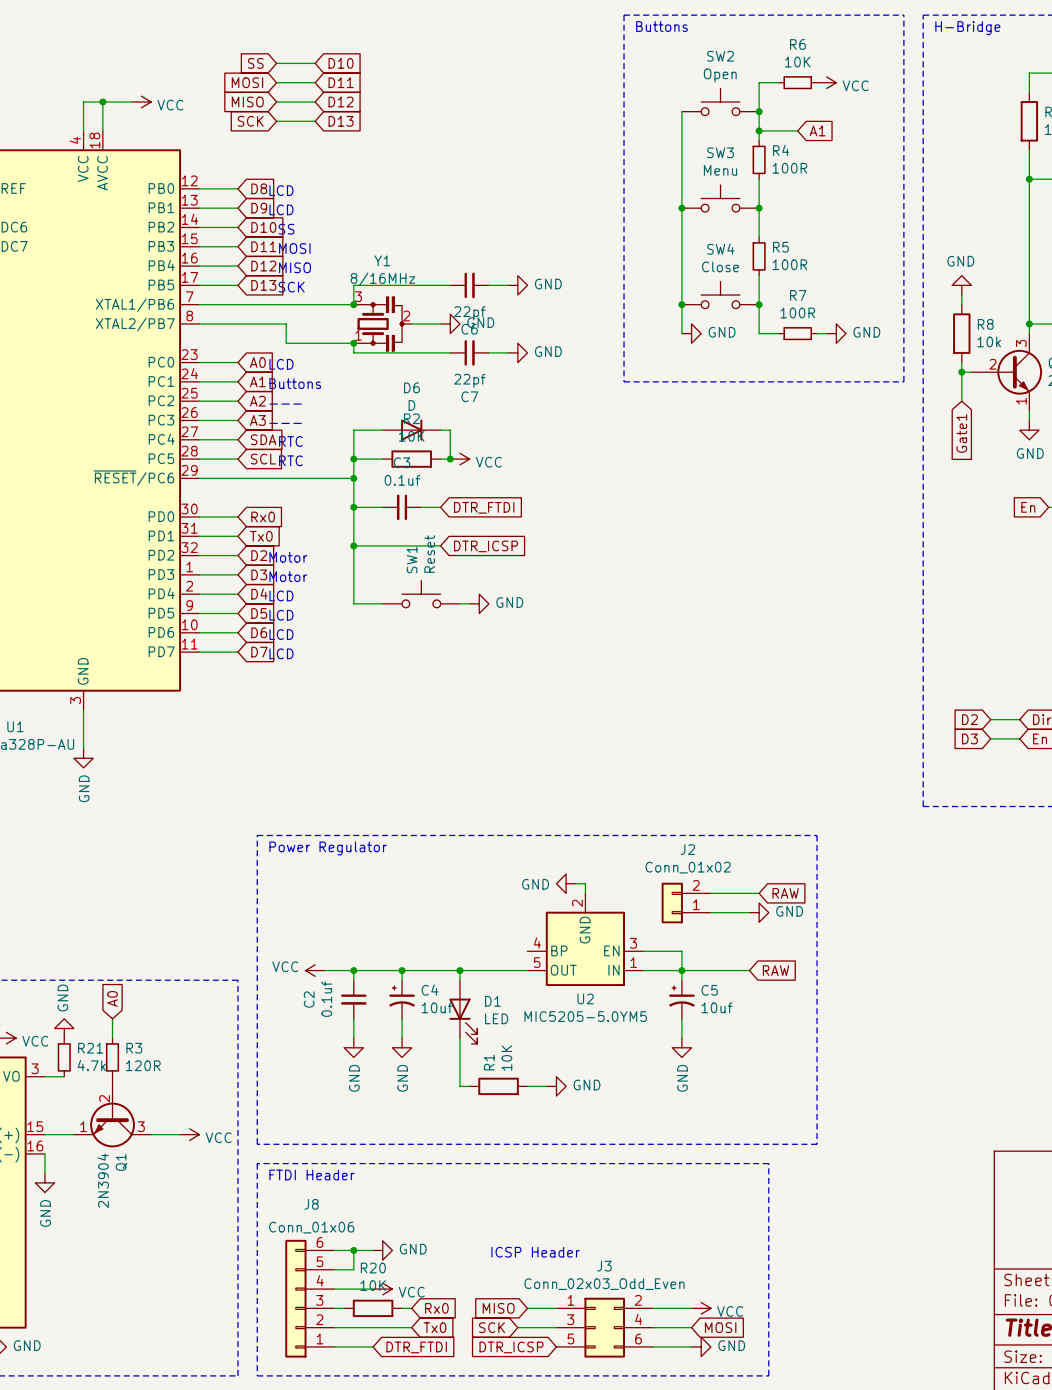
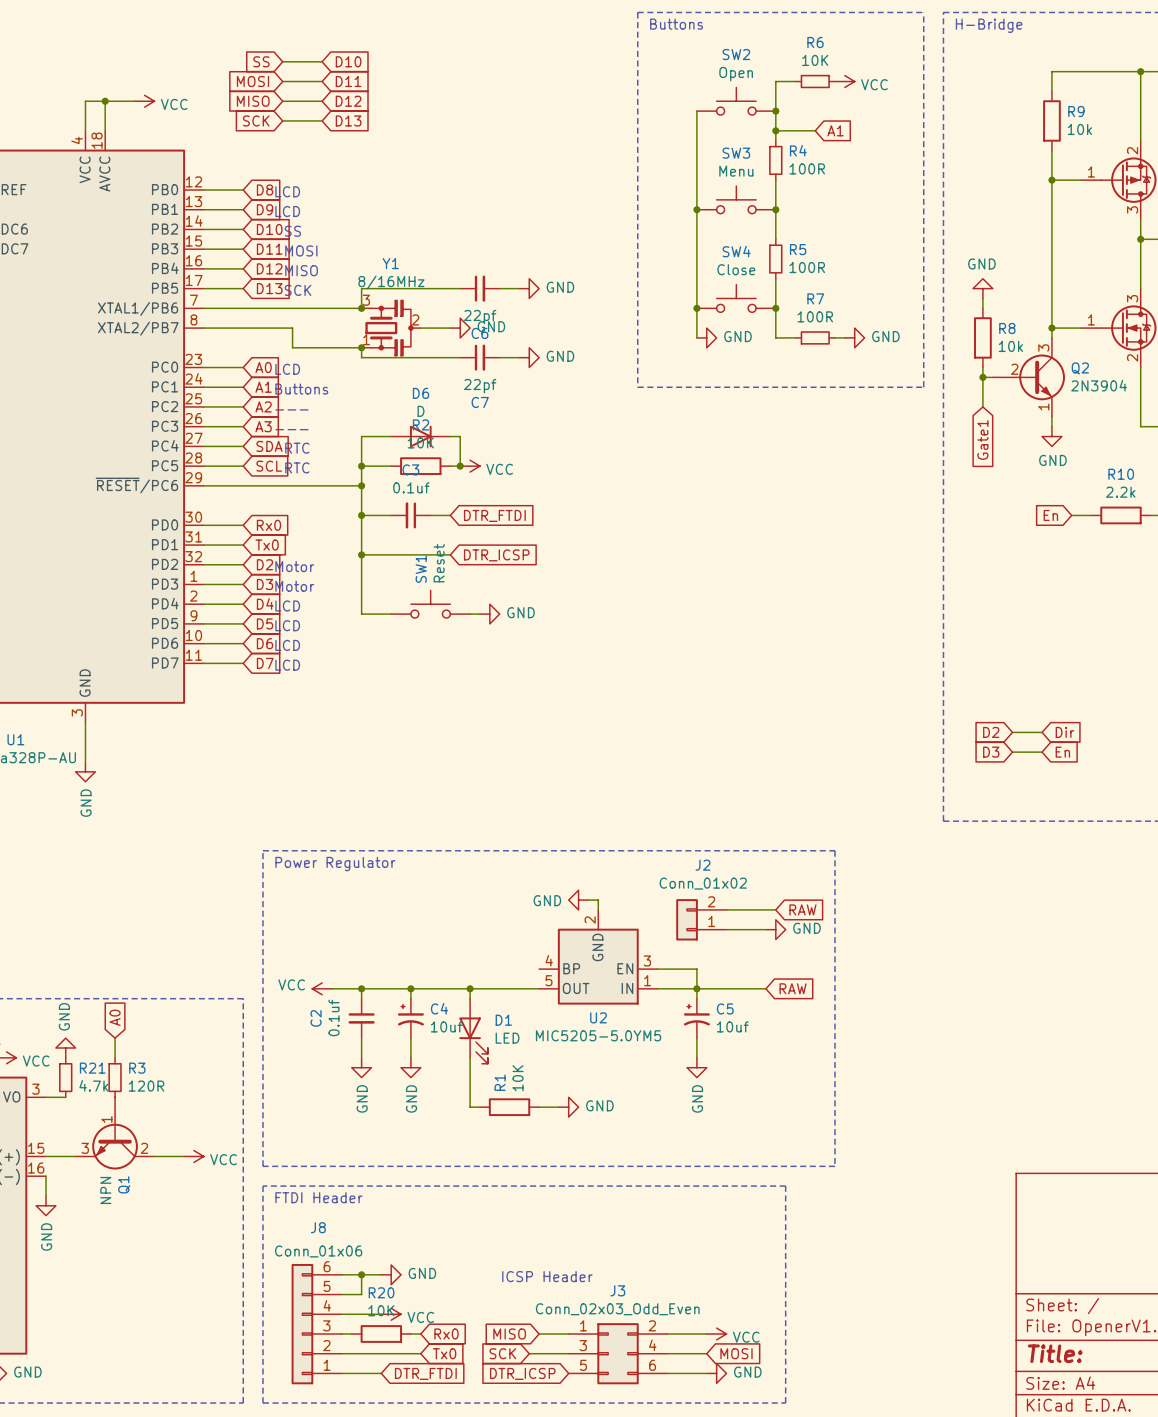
Q1 pin number: 2 (104, 1098) -> 1 (106, 1119)
Q1 pin number: 1 (83, 1126) -> 3 (85, 1148)
Q1 pin number: 3 (141, 1126) -> 2 (144, 1148)
Q1 value: 2N3904 (103, 1180) -> NPN (105, 1190)

